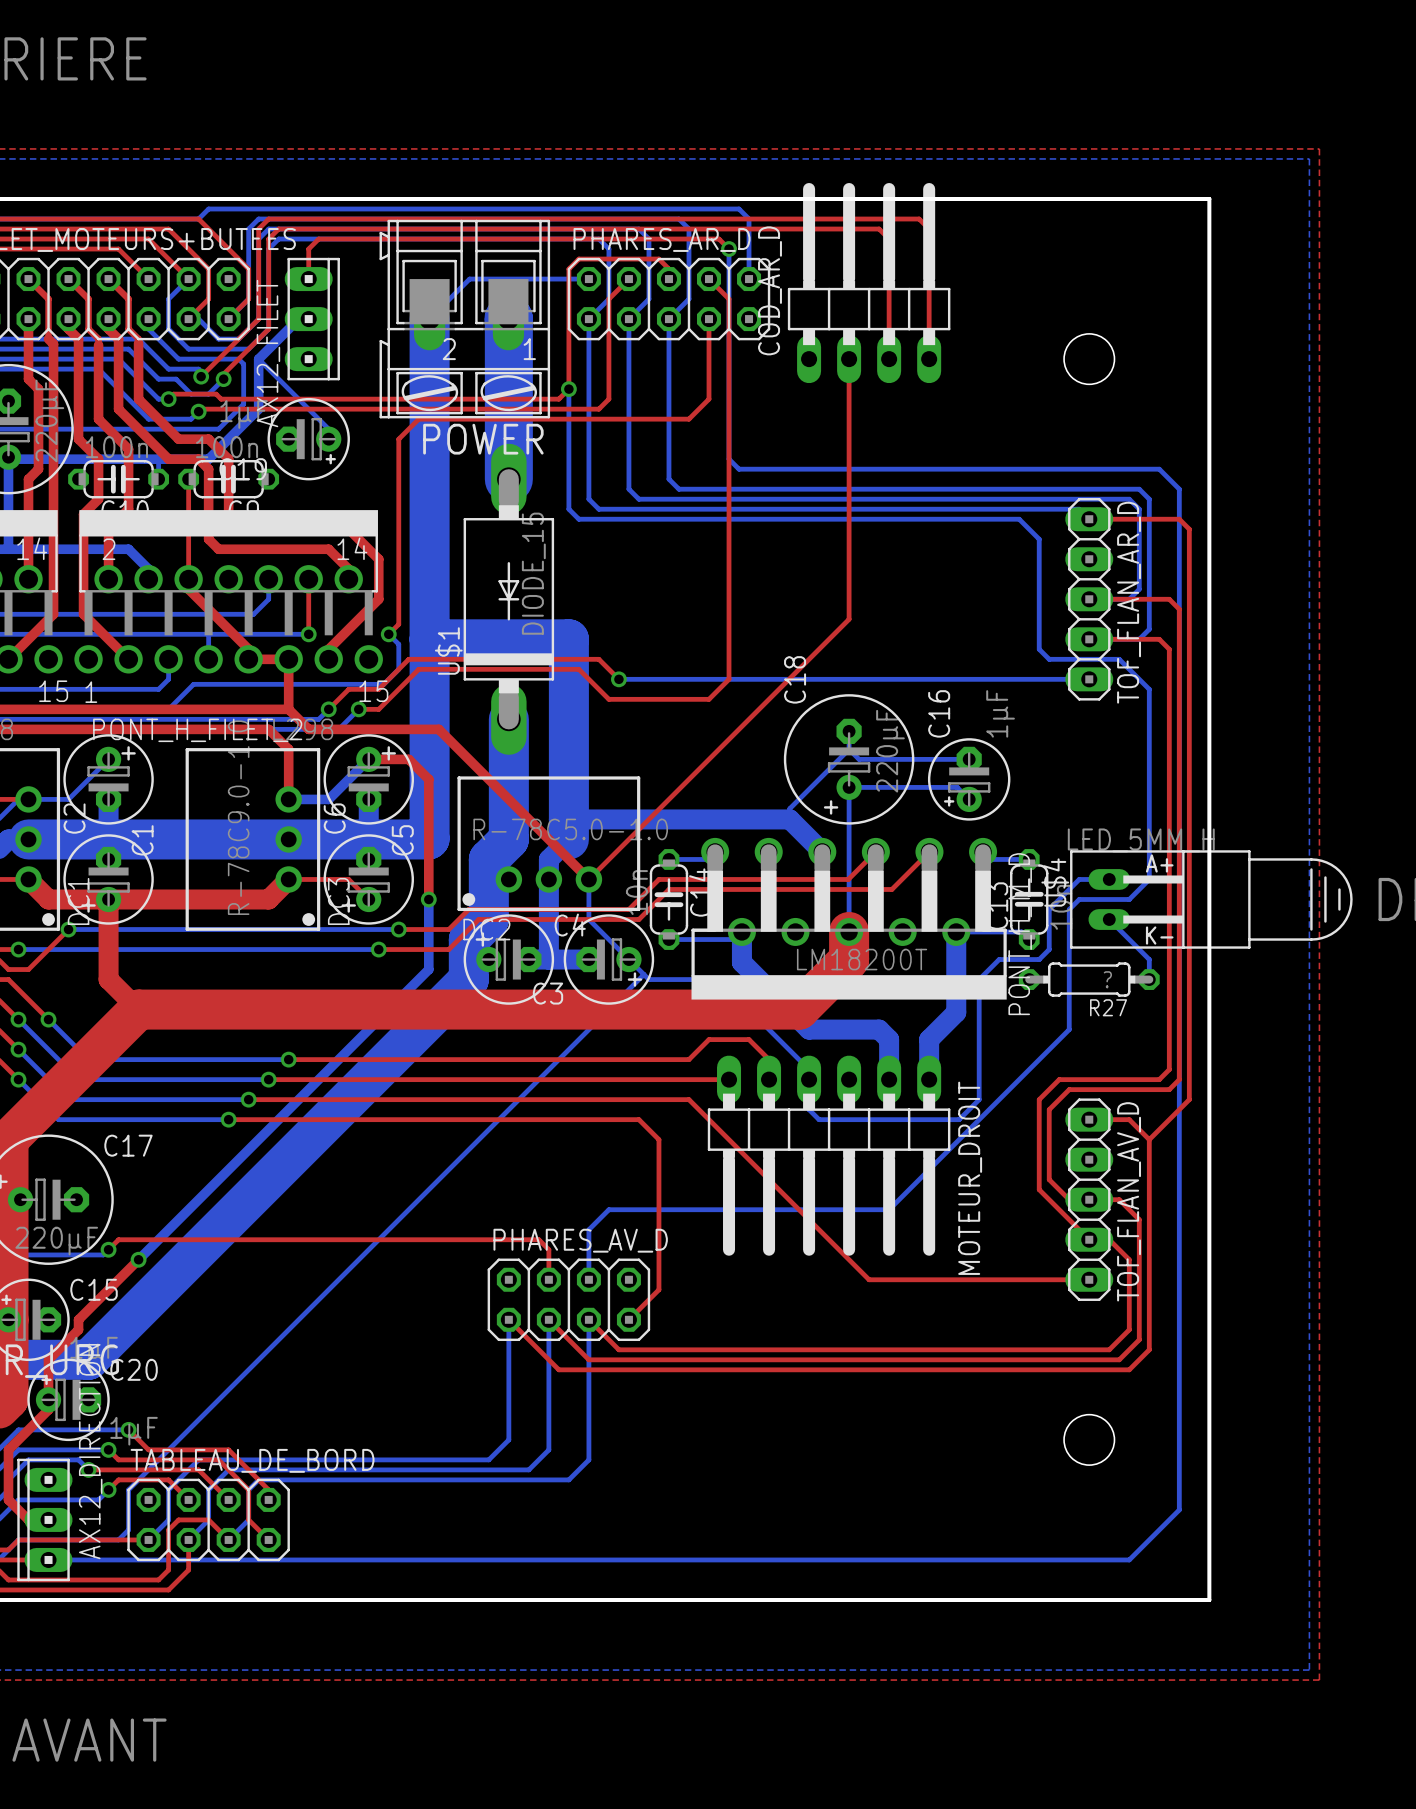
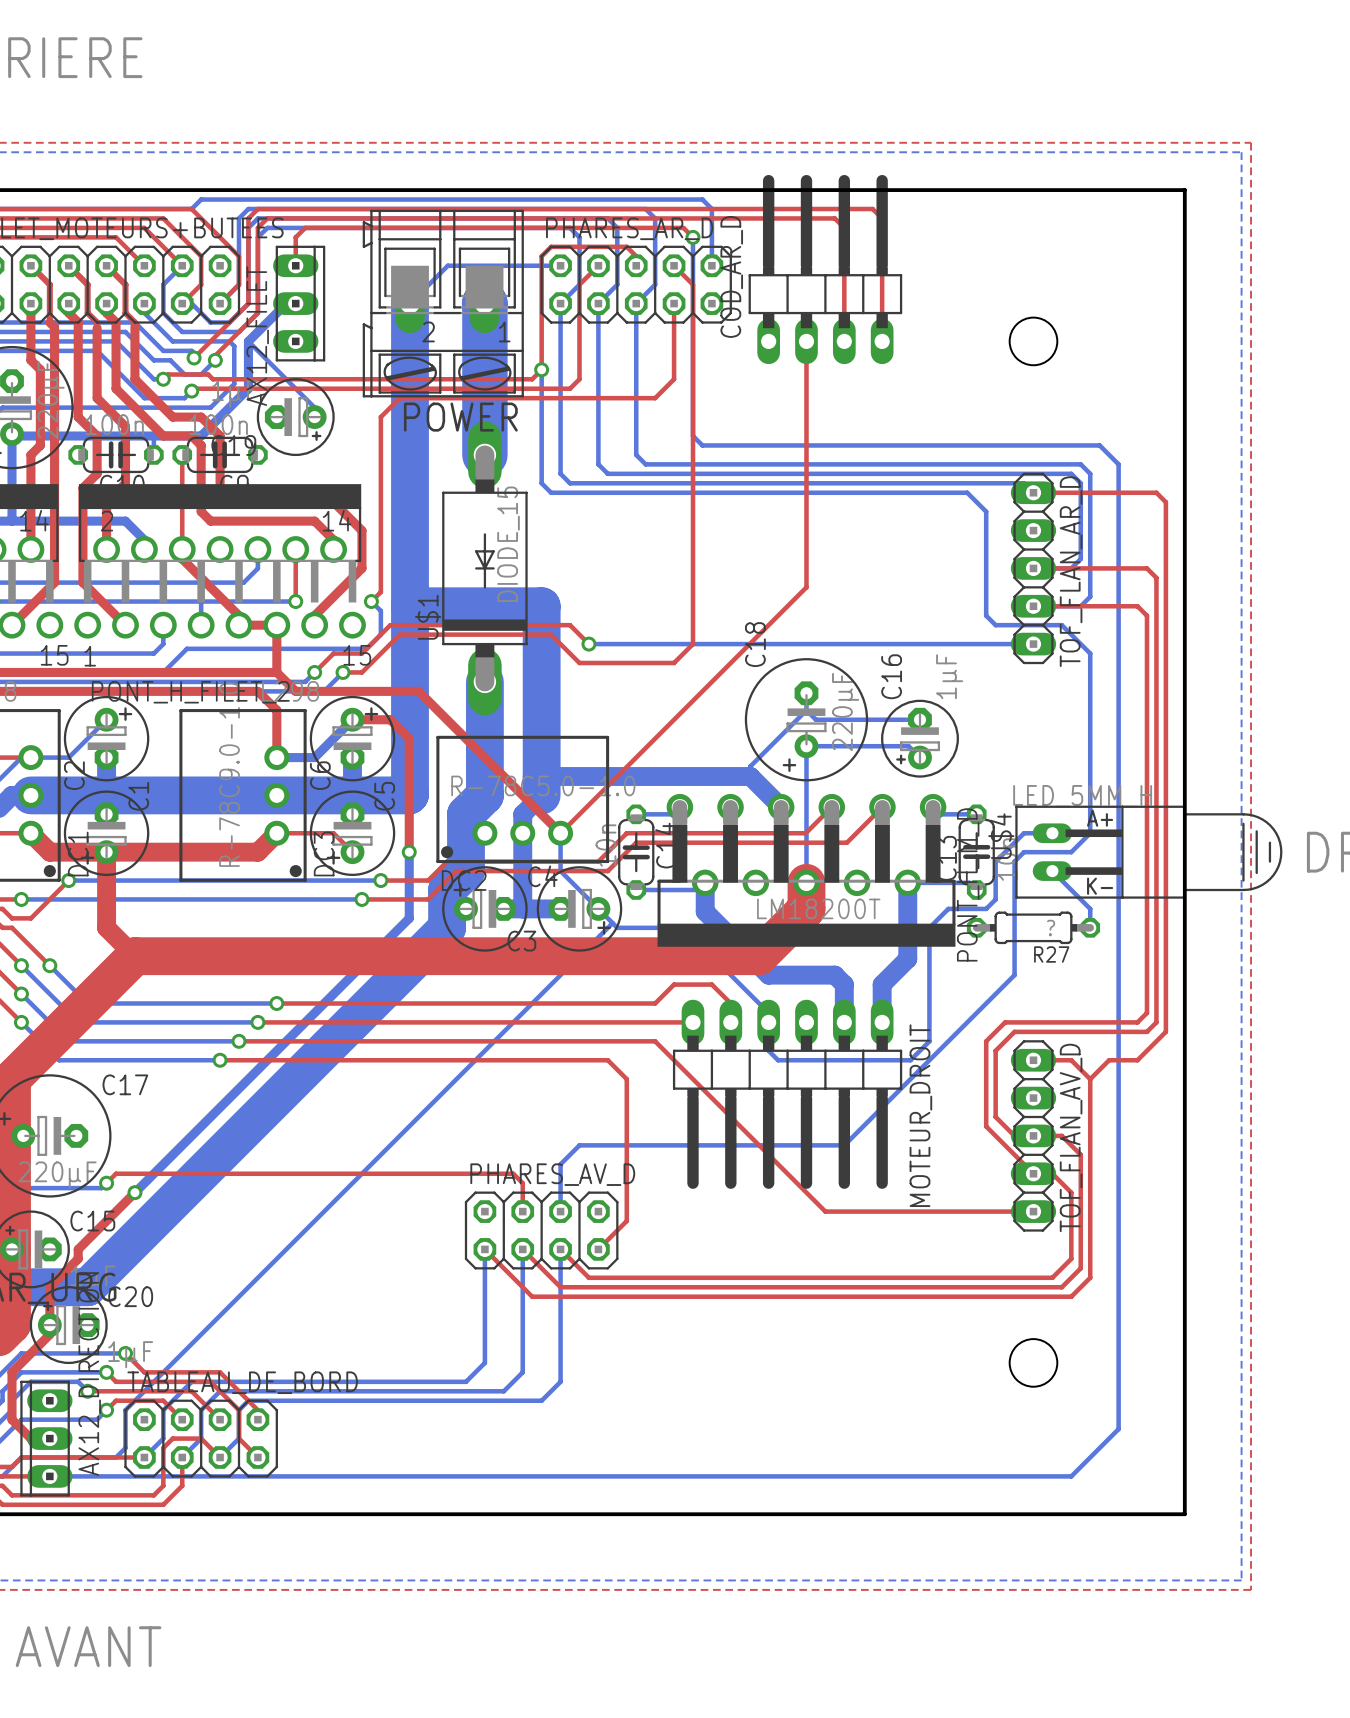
board edge: (1209, 199) (1209, 1599) -> (1146, 190) (1184, 190) (1184, 1514) (1146, 1514)
top track: (1179, 519) (1189, 529) (1189, 1099) (1169, 1119) -> (1118, 492) (1156, 492) (1165, 502) (1165, 1031) (1137, 1060) (1109, 1060)
top track: (1169, 599) (1179, 609) (1179, 1079) (1169, 1089) -> (1109, 568) (1146, 568) (1156, 577) (1156, 1022) (1146, 1031) (1109, 1031)
top track: (1159, 639) (1169, 649) (1169, 1069) (1159, 1079) -> (1099, 606) (1137, 606) (1146, 615) (1146, 1012) (1137, 1022) (1099, 1022)

